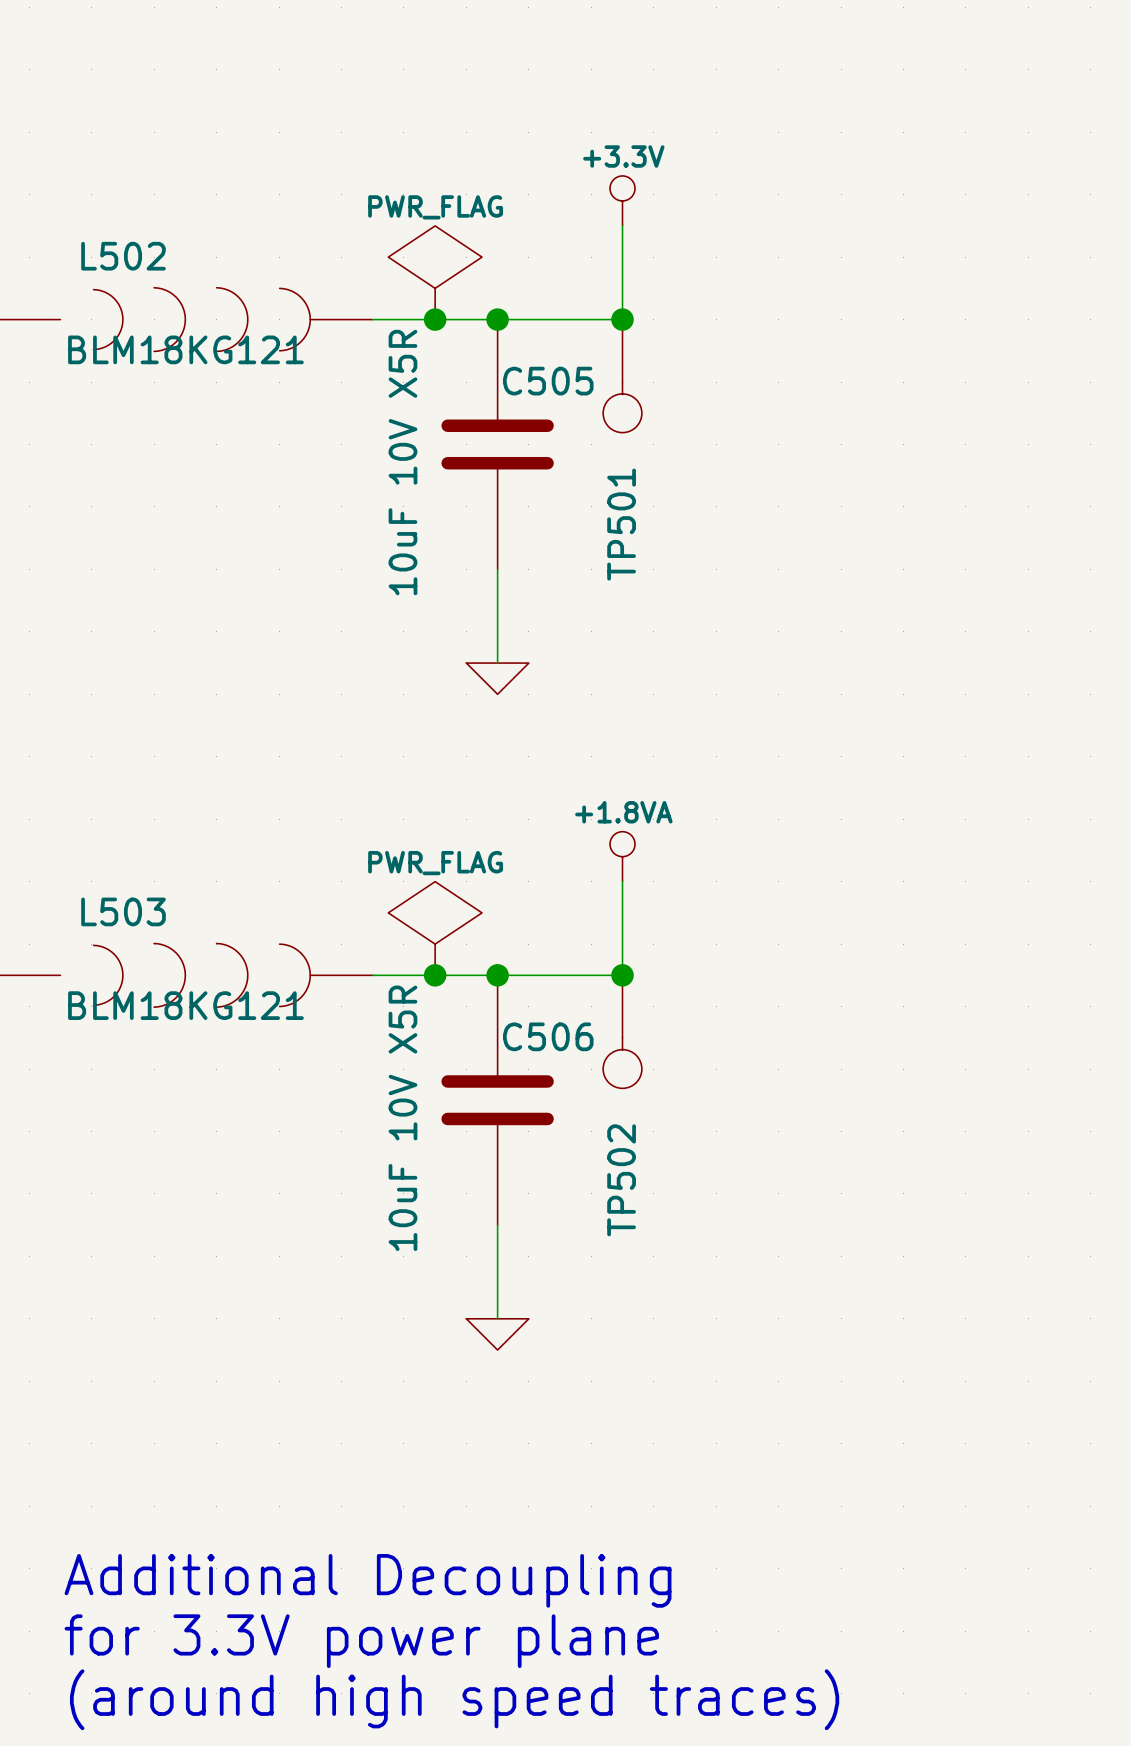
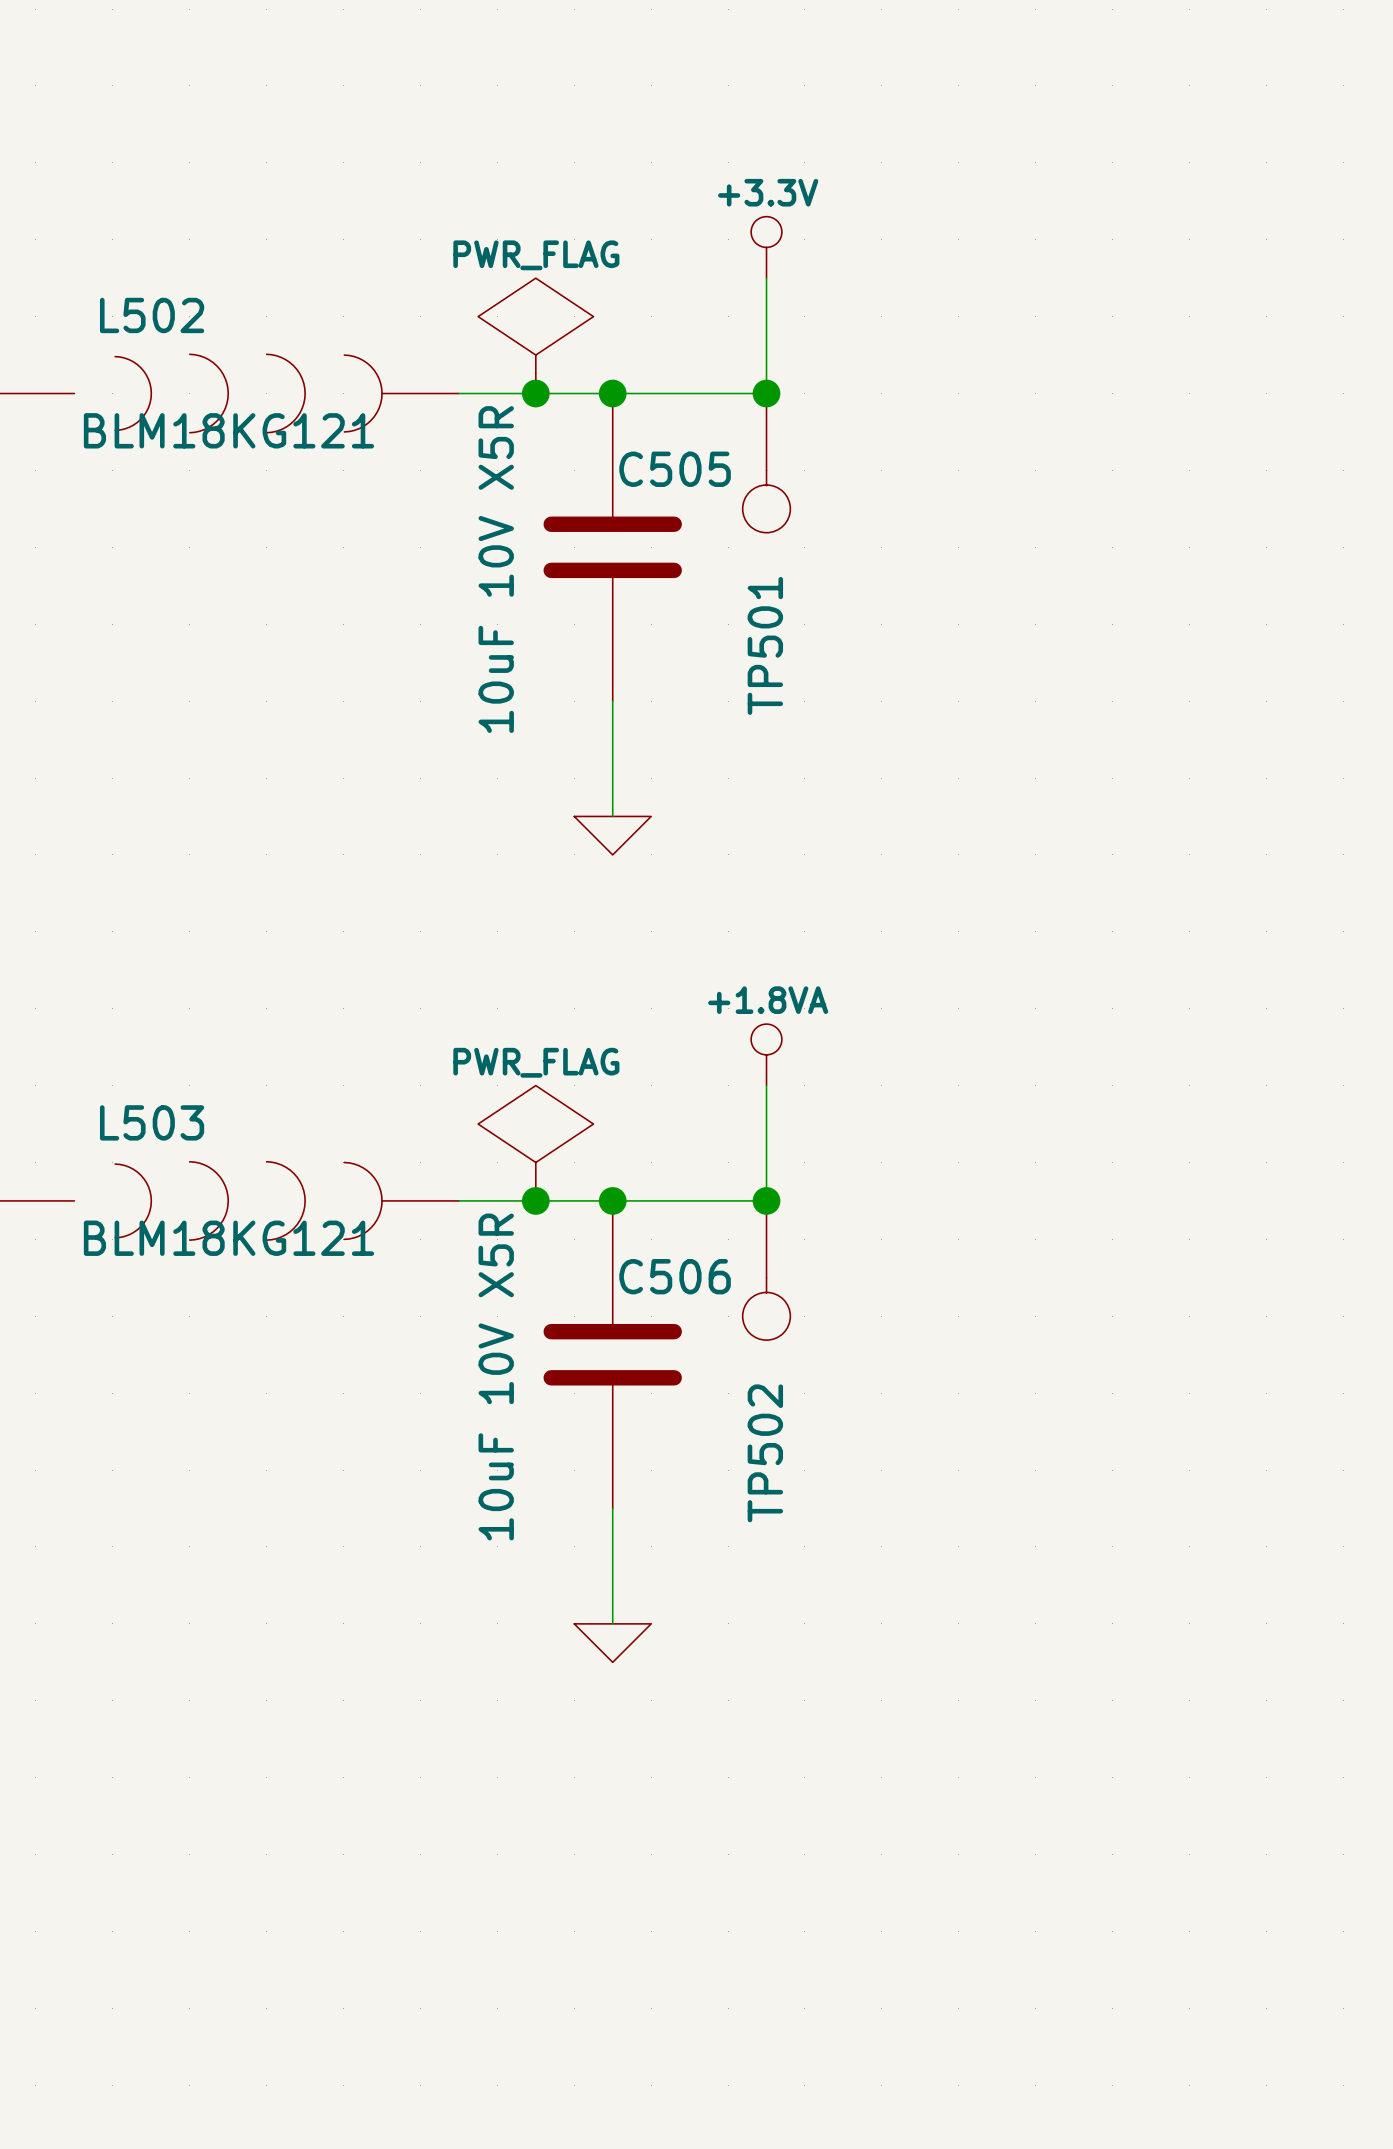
text: Additional Decoupling (368, 1580) -> none
text: for 3.3V power plane (361, 1641) -> none
text: (around high speed traces) (454, 1699) -> none

